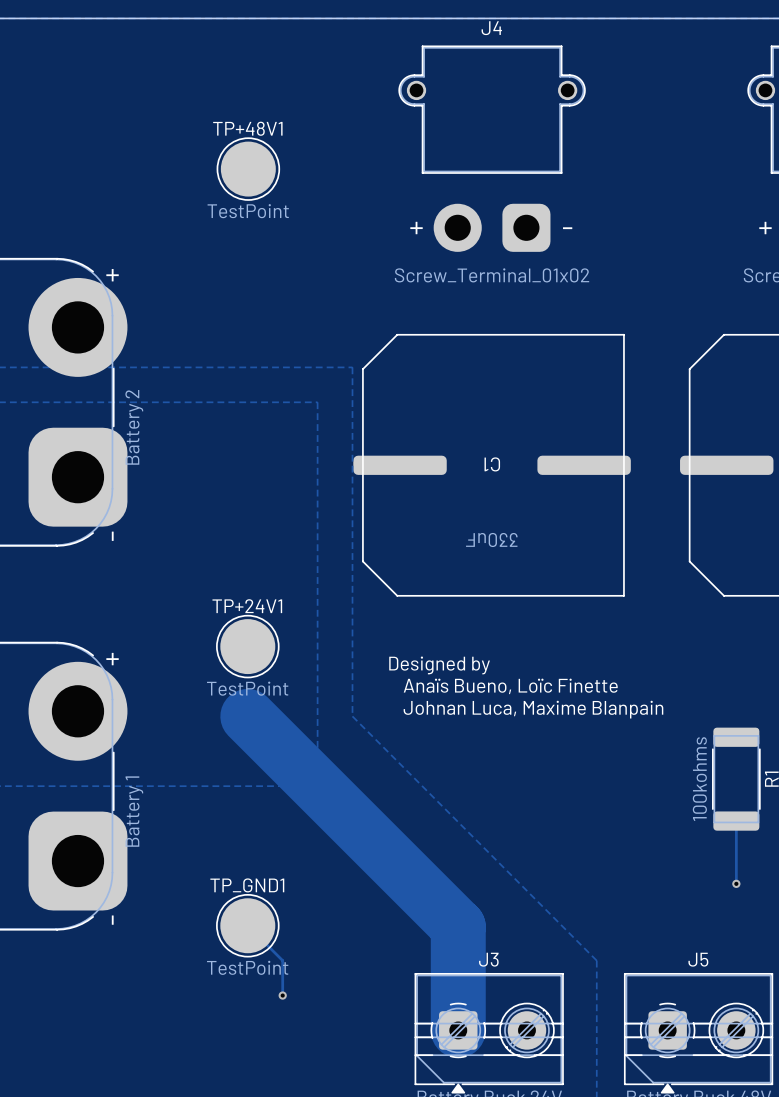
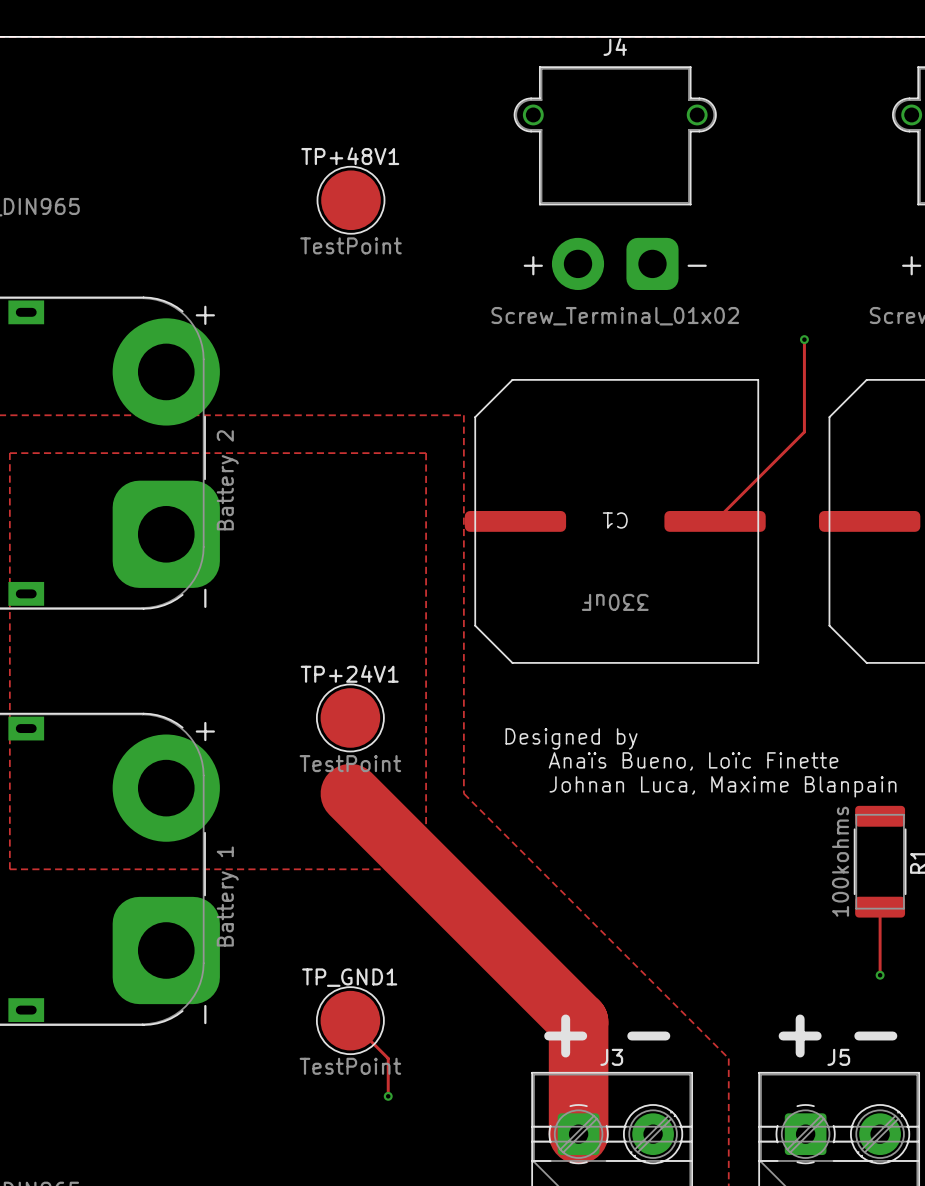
track: none -> (804, 339) (804, 432) (715, 521)
via: none -> (804, 339)
text: none -> + (565, 1036)
text: none -> + (800, 1036)
text: none -> - (648, 1036)
text: none -> - (875, 1036)

